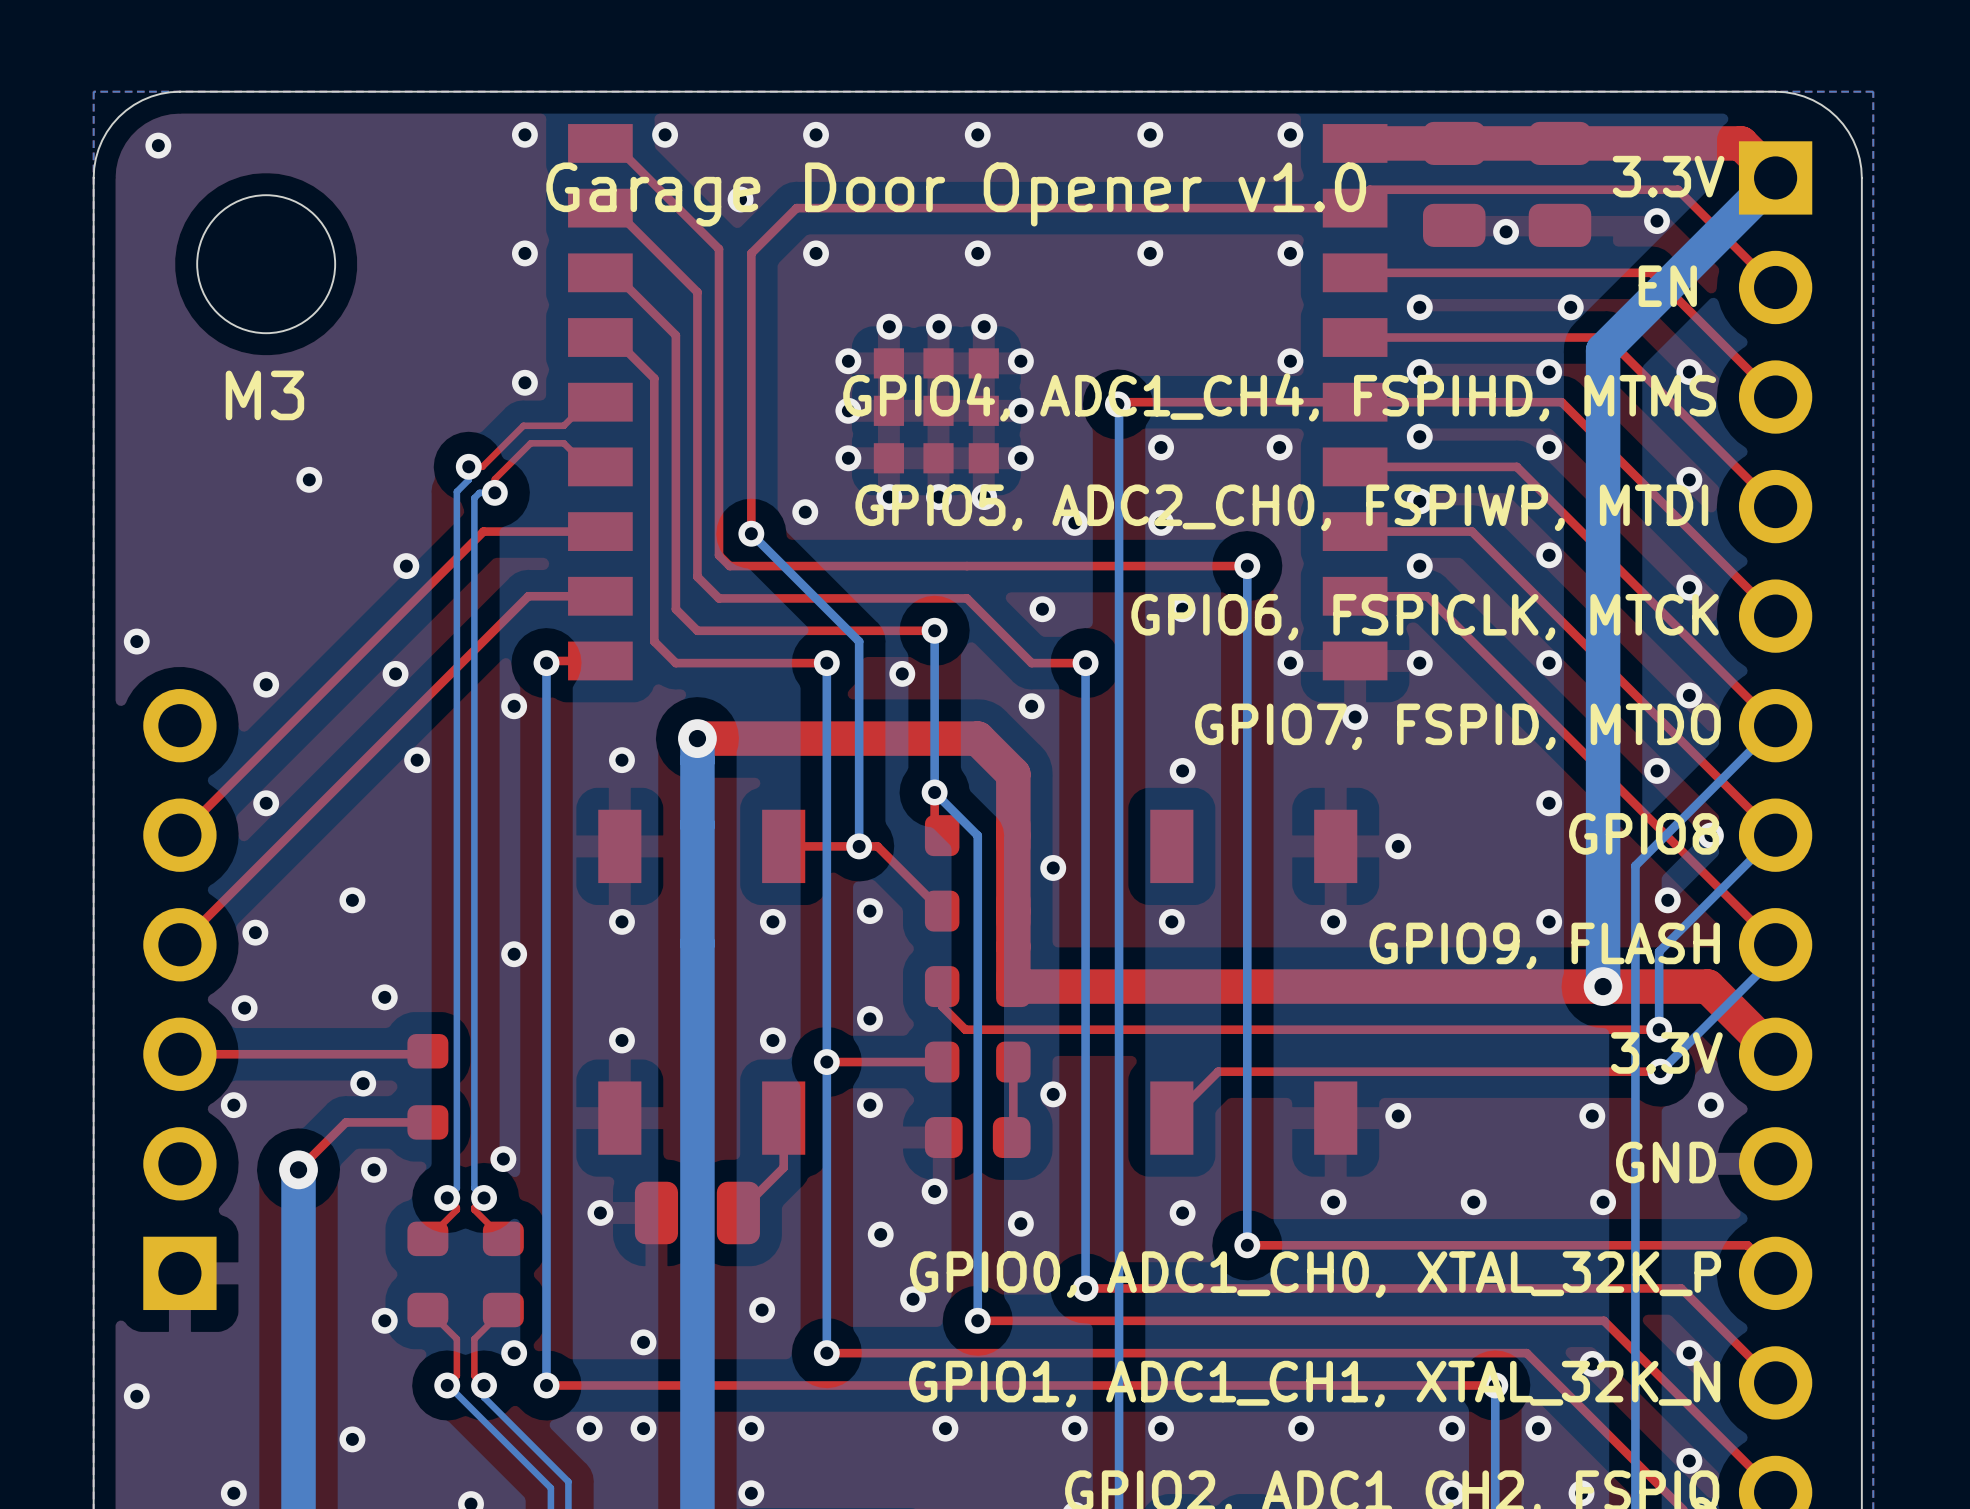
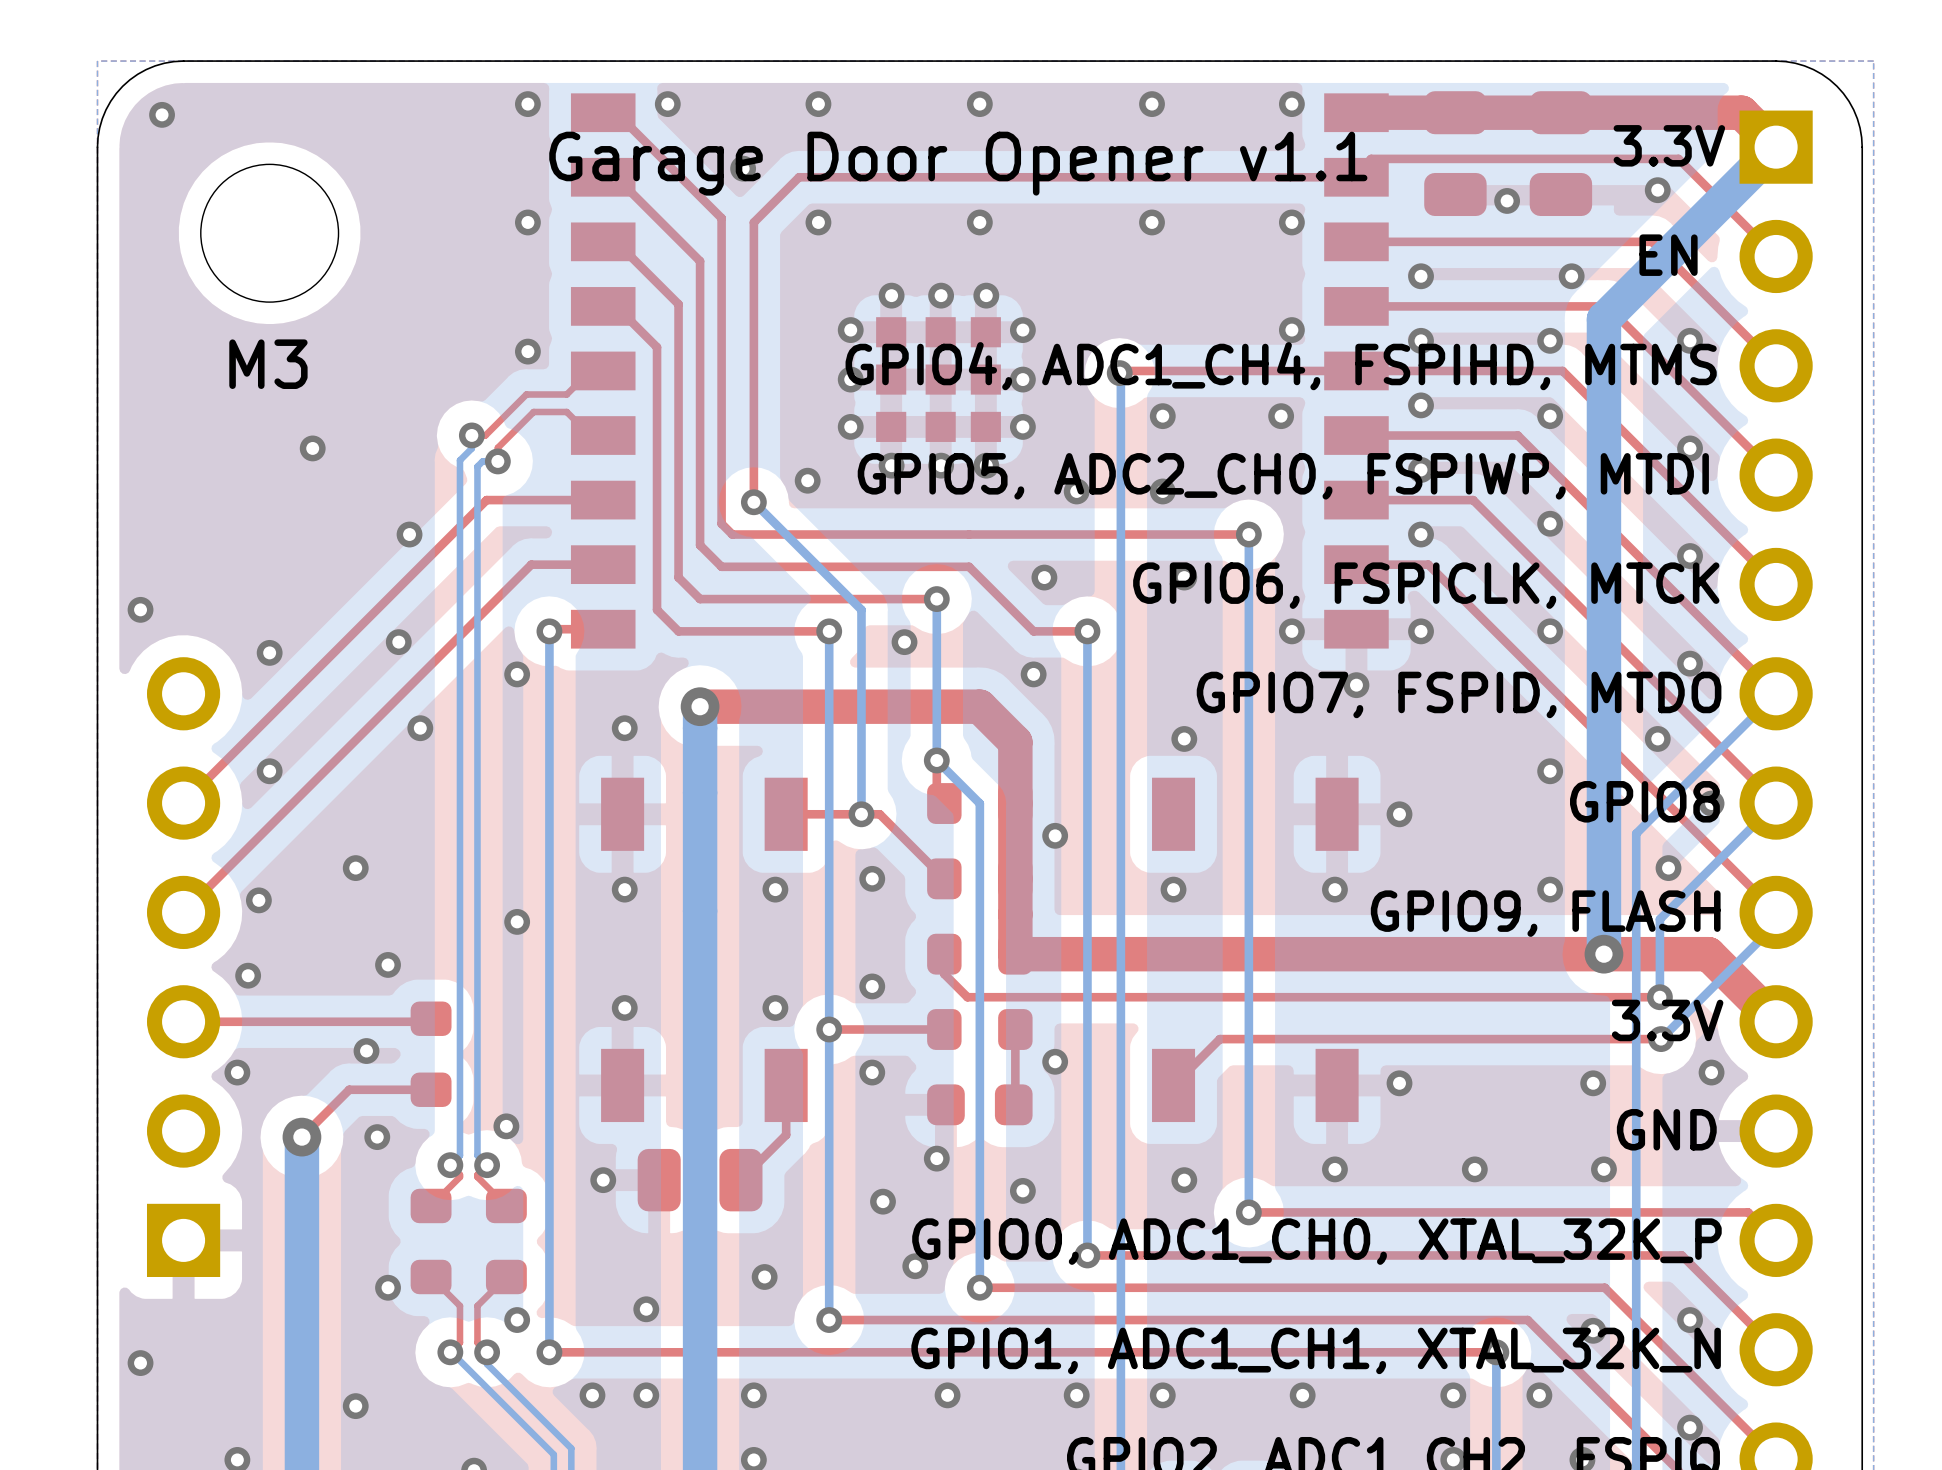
text: Garage Door Opener v1.0 (956, 194) -> Garage Door Opener v1.1 (958, 163)

